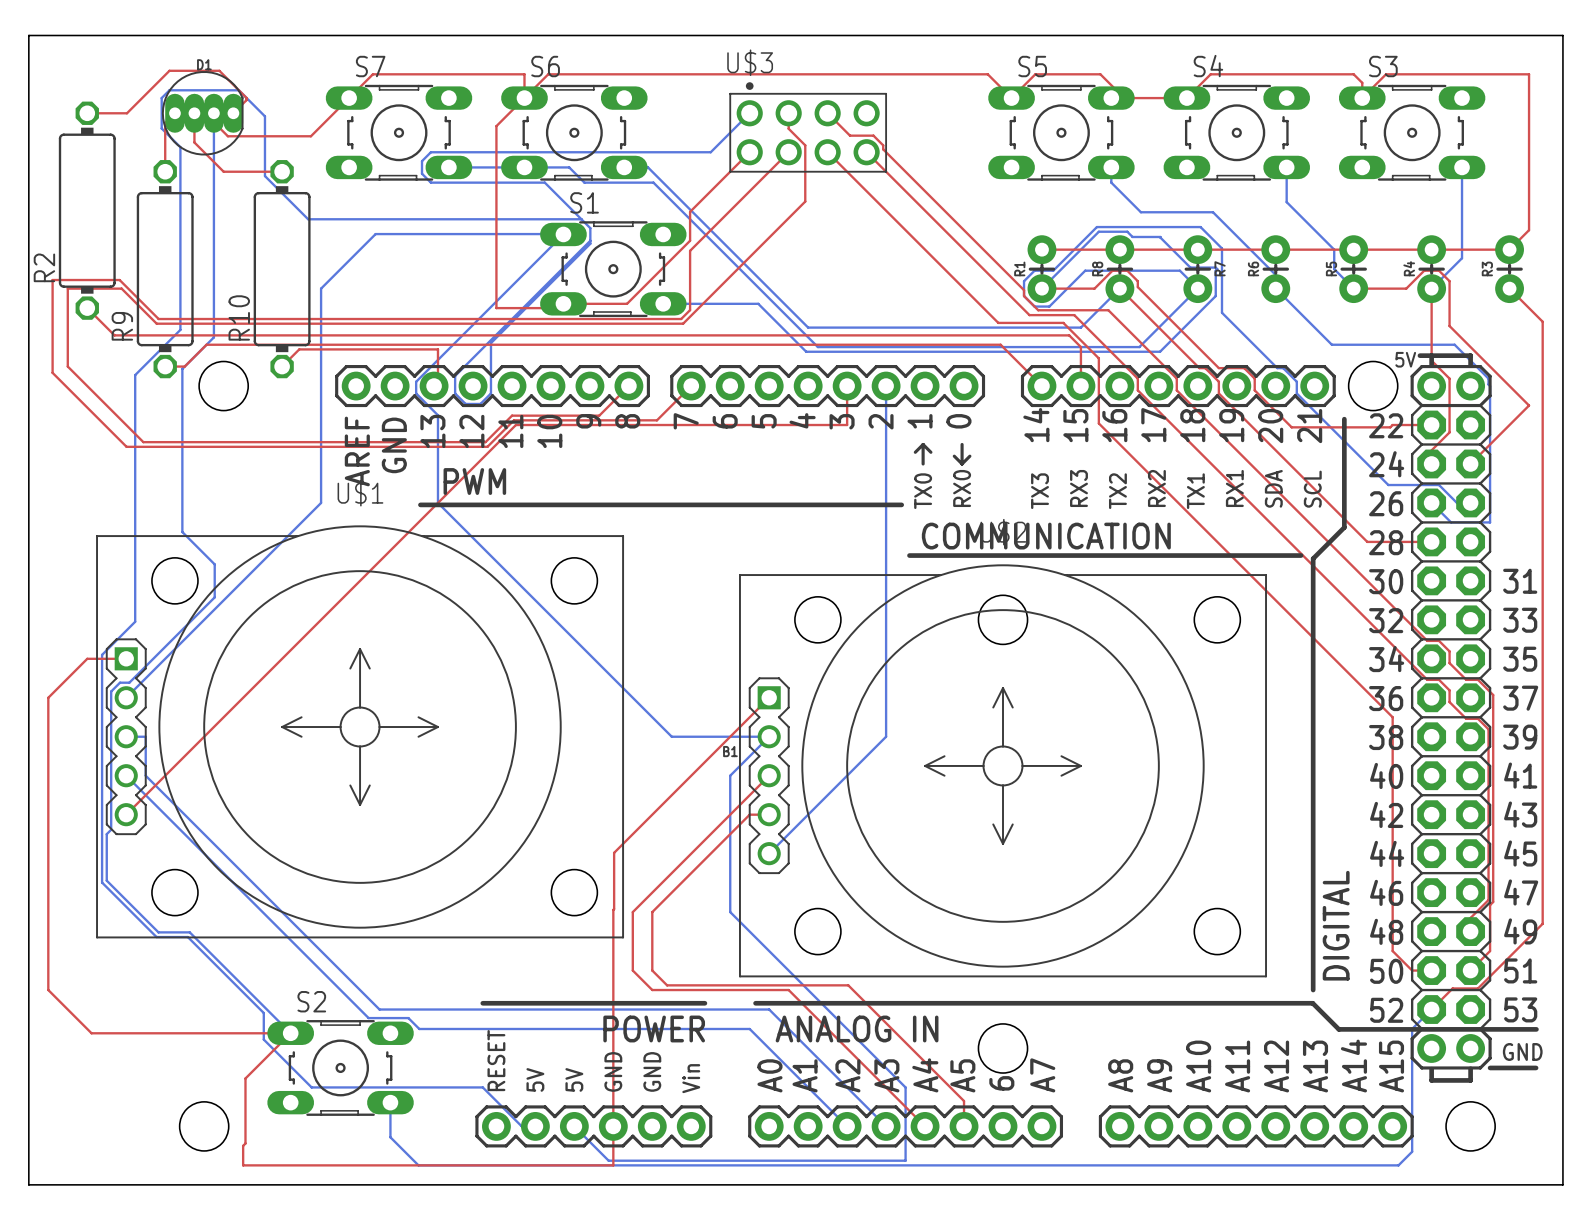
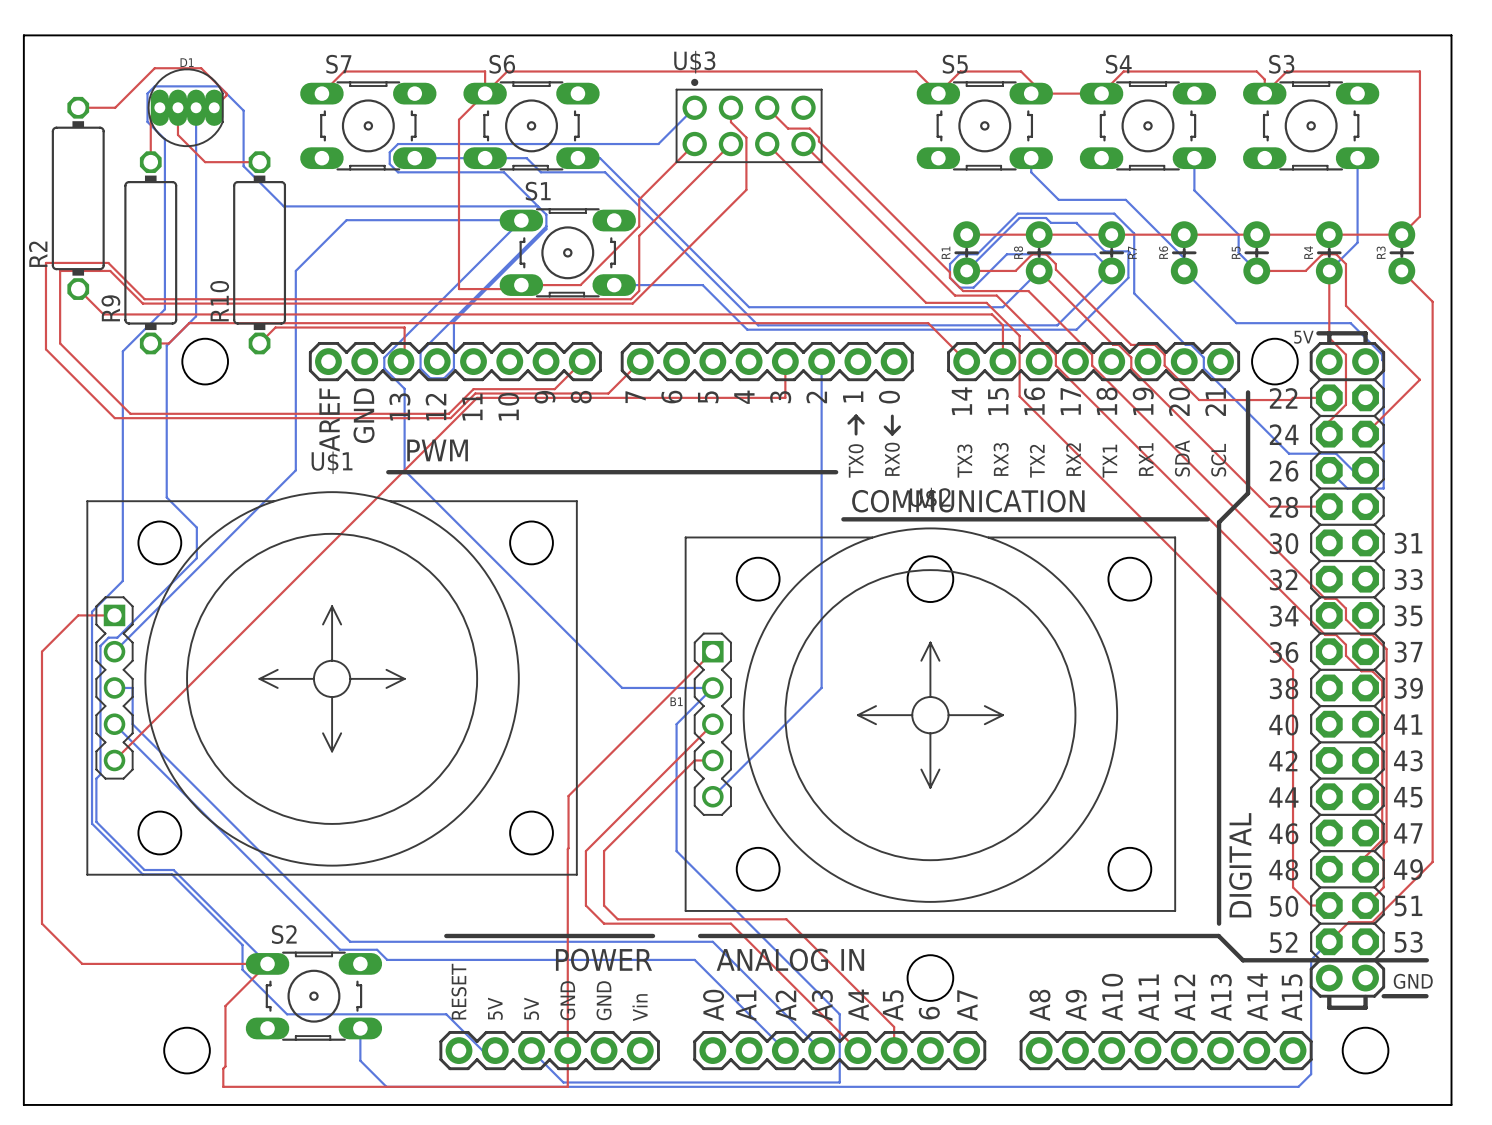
top track: (349, 98) (310, 136) (227, 136) (220, 128) (220, 119) (213, 113) -> none

